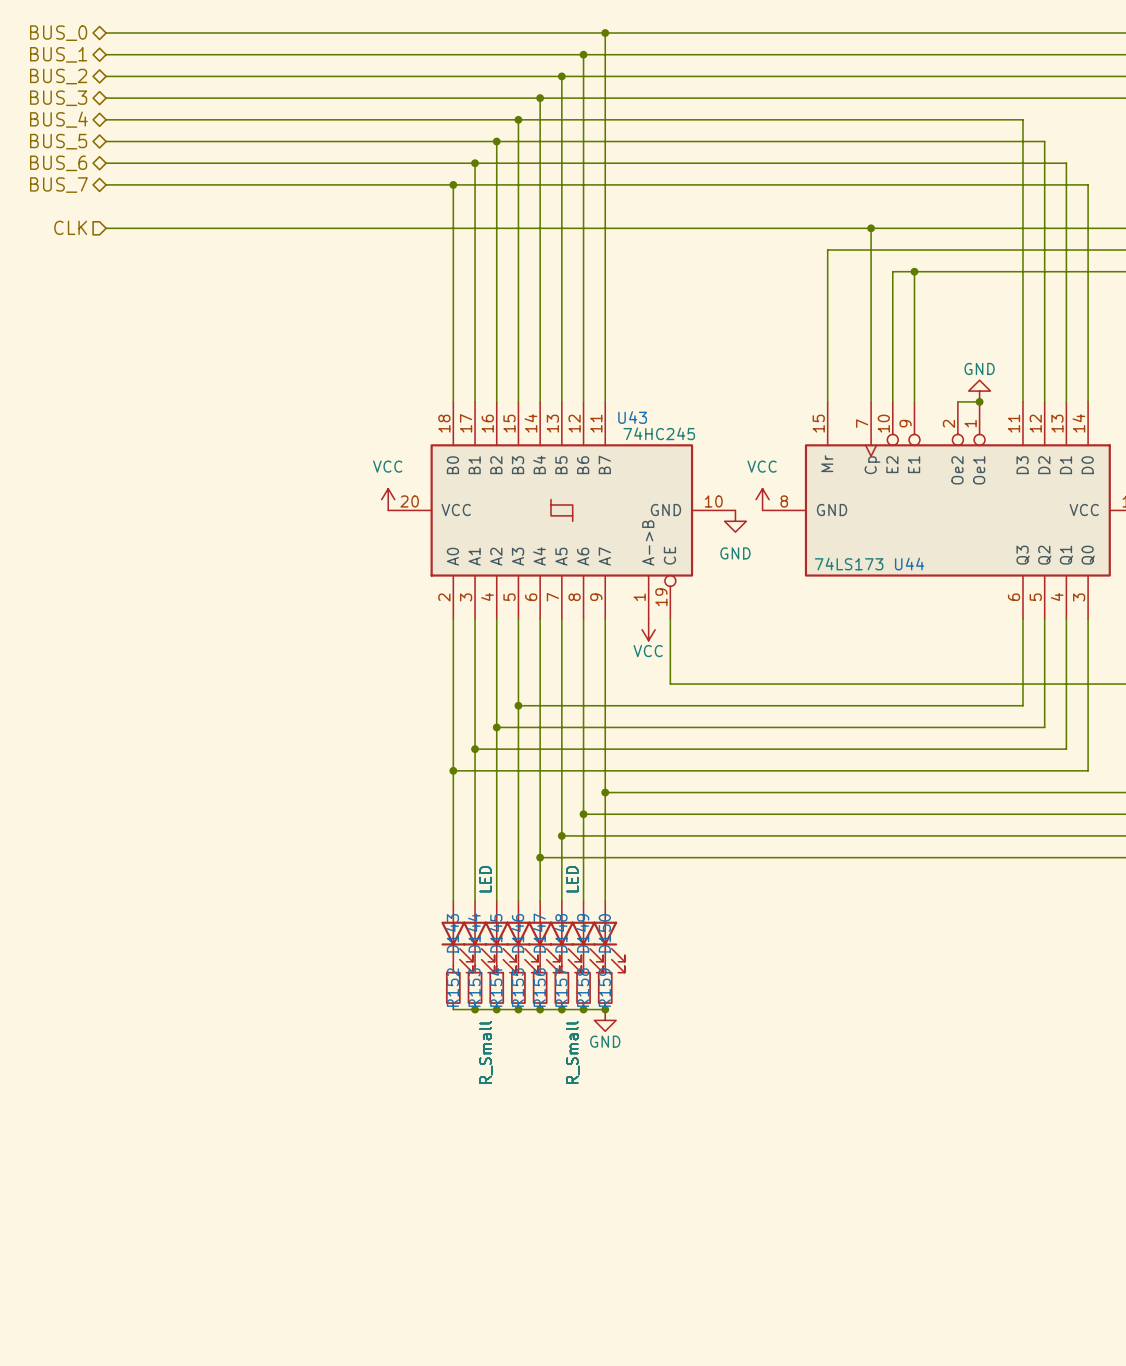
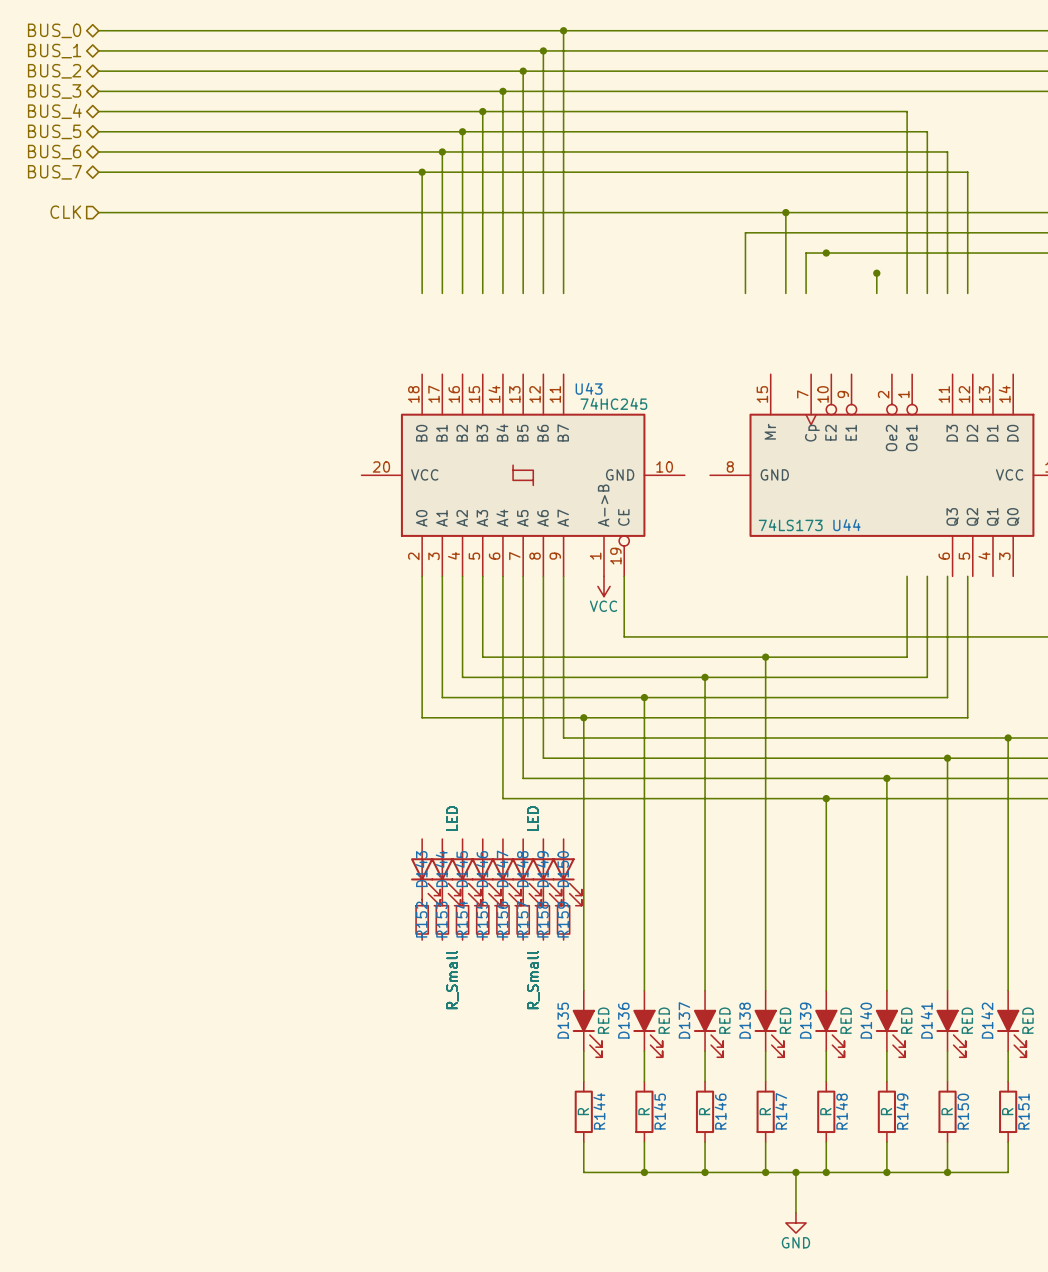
wire: (974, 119) (1022, 119) (1022, 401) -> (907, 111) (907, 293)
wire: (995, 141) (1044, 141) (1044, 401) -> (927, 131) (927, 293)
wire: (1017, 163) (1066, 163) (1066, 401) -> (947, 151) (947, 293)
wire: (1039, 184) (1088, 184) (1088, 401) -> (967, 172) (967, 293)
wire: none -> (785, 212) (785, 293)
junction: none -> (785, 212)
wire: (871, 228) (871, 401) -> none
junction: (871, 228) -> none
wire: (827, 250) (827, 401) -> (770, 232) (745, 232) (745, 293)
junction: none -> (826, 253)
wire: (892, 271) (892, 401) -> (831, 253) (806, 253) (806, 293)
wire: (914, 271) (914, 401) -> none
junction: (914, 271) -> none
wire: none -> (876, 273) (876, 293)
junction: none -> (876, 273)
wire: (453, 315) (453, 401) -> none
wire: (475, 315) (475, 401) -> none
wire: (496, 315) (496, 401) -> none
wire: (518, 315) (518, 401) -> none
wire: (540, 315) (540, 401) -> none
wire: (561, 315) (561, 401) -> none
wire: (583, 315) (583, 401) -> none
wire: (605, 315) (605, 401) -> none
power symbol: GND (979, 391) -> none
wire: (957, 401) (979, 401) -> none
junction: (979, 401) -> none
power symbol: VCC (388, 499) -> none
power symbol: VCC (762, 499) -> none
power symbol: GND (735, 521) -> none
wire: (1022, 618) (1022, 705) (974, 705) -> (907, 576) (907, 657)
wire: (1044, 618) (1044, 727) (995, 727) -> (927, 576) (927, 677)
wire: (1066, 618) (1066, 749) (1017, 749) -> (947, 576) (947, 697)
wire: (1088, 618) (1088, 770) (1039, 770) -> (967, 576) (967, 717)
wire: (518, 705) (518, 901) -> none
junction: (518, 705) -> none
wire: none -> (765, 657) (765, 990)
junction: none -> (765, 657)
wire: (496, 727) (496, 901) -> none
junction: (496, 727) -> none
wire: none -> (705, 677) (705, 990)
junction: none -> (705, 677)
wire: (475, 749) (475, 901) -> none
junction: (475, 749) -> none
wire: none -> (644, 697) (644, 990)
junction: none -> (644, 697)
wire: (453, 770) (453, 901) -> none
junction: (453, 770) -> none
wire: none -> (583, 717) (583, 990)
junction: none -> (583, 717)
wire: (605, 792) (605, 901) -> none
junction: (605, 792) -> none
wire: none -> (1008, 737) (1008, 990)
junction: none -> (1008, 737)
wire: (583, 814) (583, 901) -> none
junction: (583, 814) -> none
wire: none -> (947, 758) (947, 990)
junction: none -> (947, 758)
wire: (561, 835) (561, 901) -> none
junction: (561, 835) -> none
wire: none -> (886, 778) (886, 990)
junction: none -> (886, 778)
wire: (540, 857) (540, 901) -> none
junction: (540, 857) -> none
wire: none -> (826, 798) (826, 990)
junction: none -> (826, 798)
wire: (453, 1009) (605, 1009) -> none
junction: (475, 1009) -> none
junction: (496, 1009) -> none
junction: (518, 1009) -> none
junction: (540, 1009) -> none
junction: (561, 1009) -> none
junction: (583, 1009) -> none
junction: (605, 1009) -> none
power symbol: GND (605, 1020) -> none
D135: none -> RED (587, 1023)
D136: none -> RED (647, 1023)
D137: none -> RED (708, 1023)
D138: none -> RED (769, 1023)
D139: none -> RED (829, 1023)
D140: none -> RED (890, 1023)
D141: none -> RED (951, 1023)
D142: none -> RED (1011, 1023)
wire: none -> (583, 1051) (583, 1081)
wire: none -> (644, 1051) (644, 1081)
wire: none -> (705, 1051) (705, 1081)
wire: none -> (765, 1051) (765, 1081)
wire: none -> (826, 1051) (826, 1081)
wire: none -> (886, 1051) (886, 1081)
wire: none -> (947, 1051) (947, 1081)
wire: none -> (1008, 1051) (1008, 1081)
R144: none -> R (583, 1111)
R145: none -> R (644, 1111)
R146: none -> R (705, 1111)
R147: none -> R (765, 1111)
R148: none -> R (826, 1111)
R149: none -> R (886, 1111)
R150: none -> R (947, 1111)
R151: none -> R (1008, 1111)
wire: none -> (583, 1142) (583, 1172) (1008, 1172) (1008, 1142)
wire: none -> (644, 1142) (644, 1172)
wire: none -> (705, 1142) (705, 1172)
wire: none -> (765, 1142) (765, 1172)
wire: none -> (826, 1142) (826, 1172)
wire: none -> (886, 1142) (886, 1172)
wire: none -> (947, 1142) (947, 1172)
junction: none -> (644, 1172)
junction: none -> (705, 1172)
junction: none -> (765, 1172)
wire: none -> (795, 1172) (795, 1212)
junction: none -> (795, 1172)
junction: none -> (826, 1172)
junction: none -> (886, 1172)
junction: none -> (947, 1172)
power symbol: none -> GND (795, 1222)

